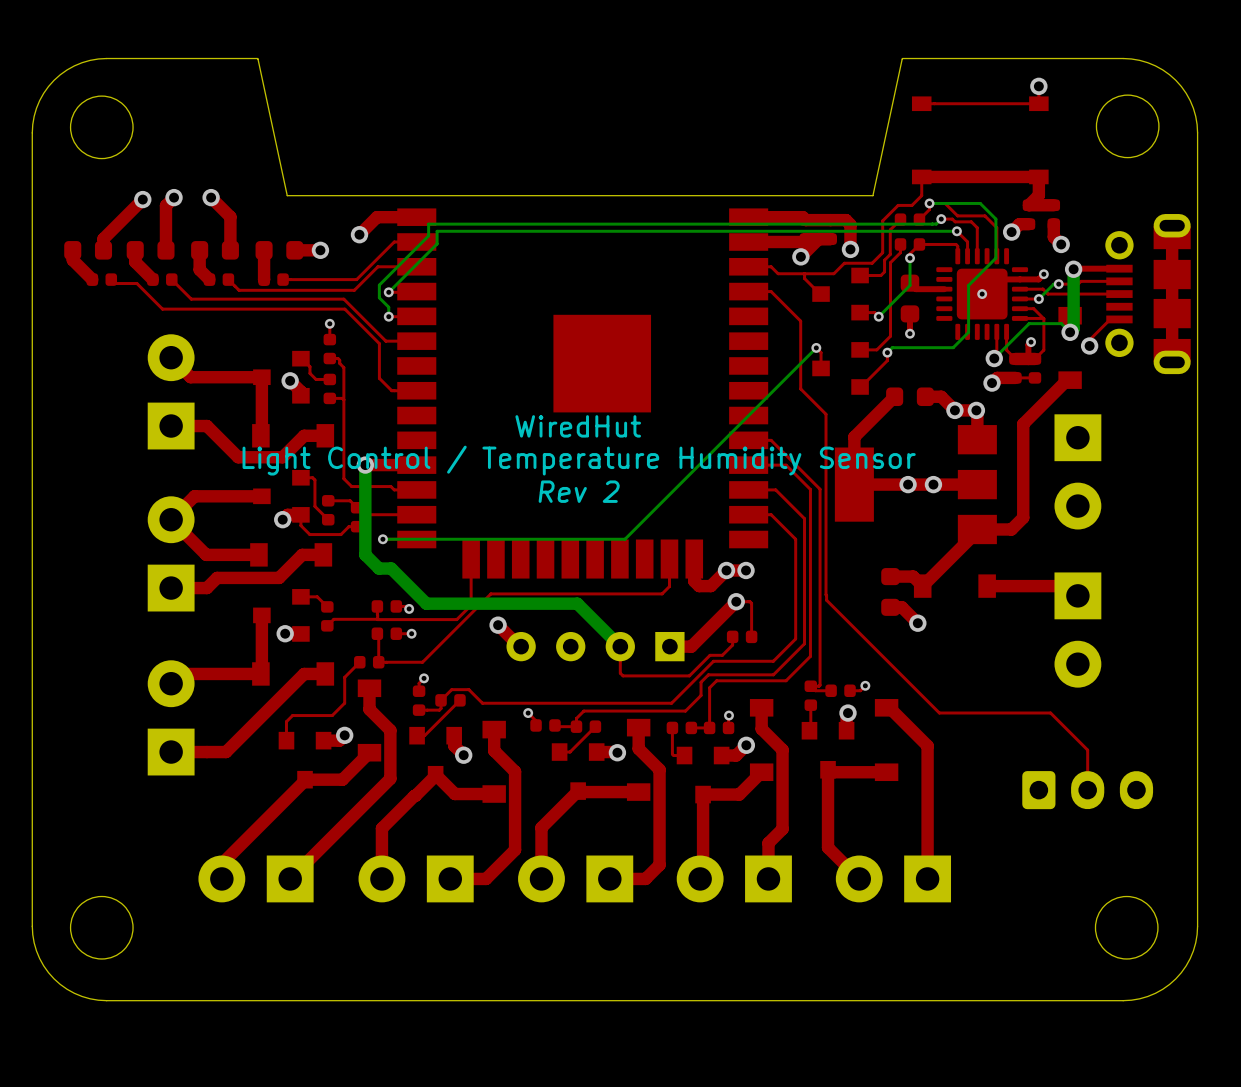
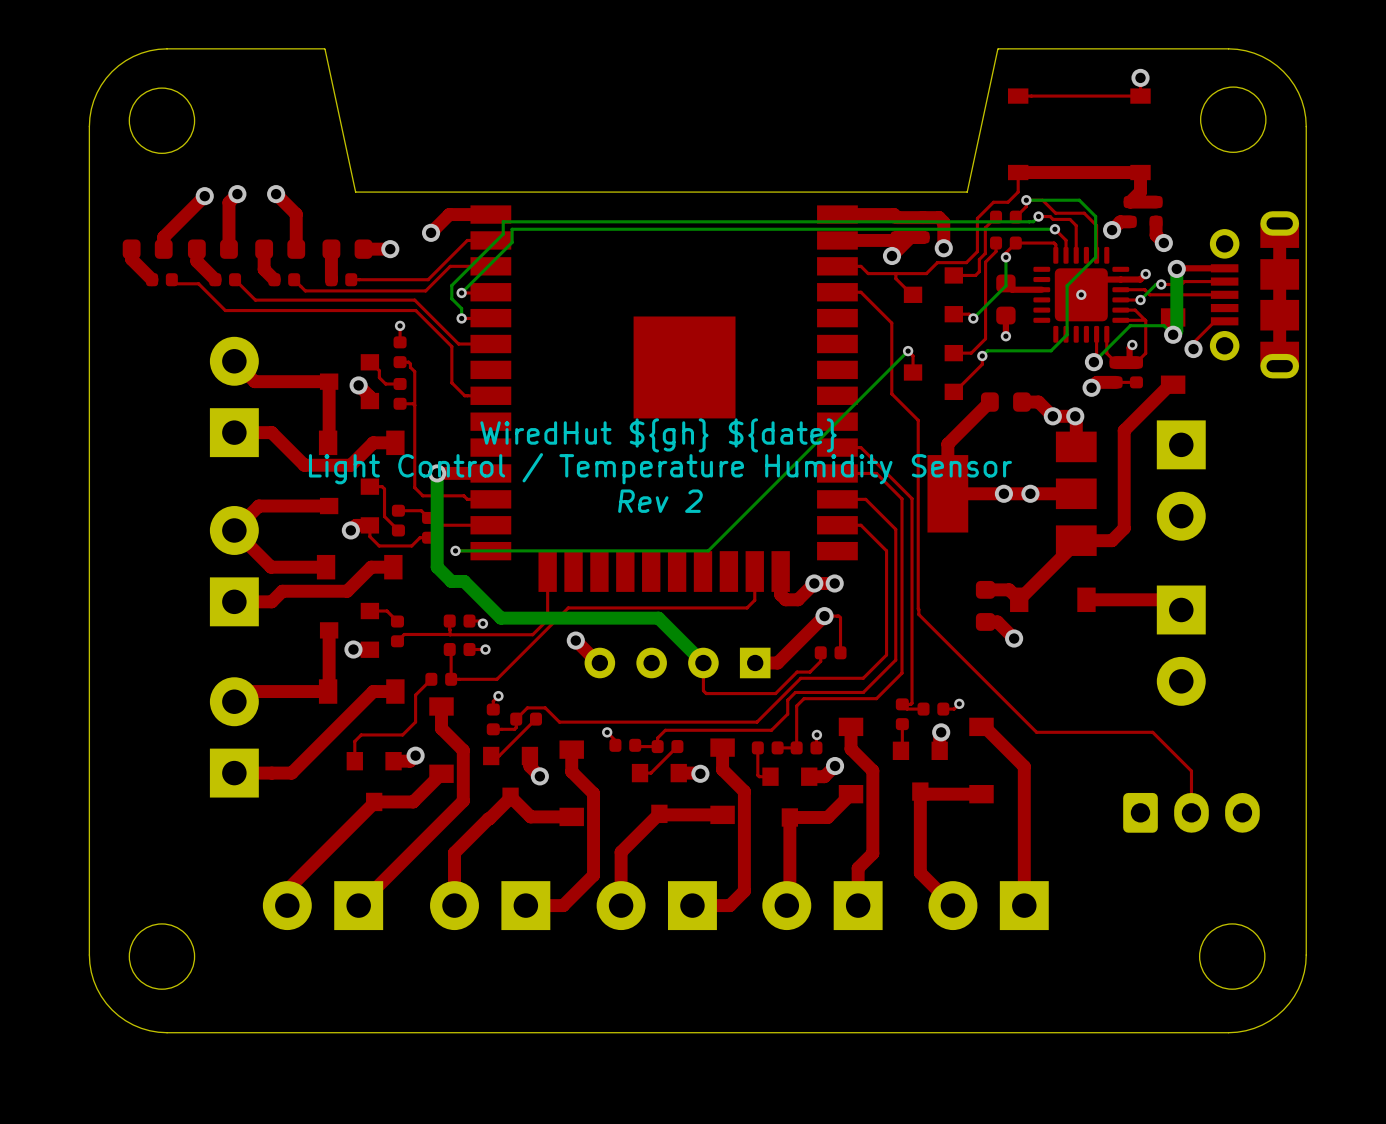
text: WiredHut (578, 426) -> WiredHut ${gh} ${date} (658, 435)

